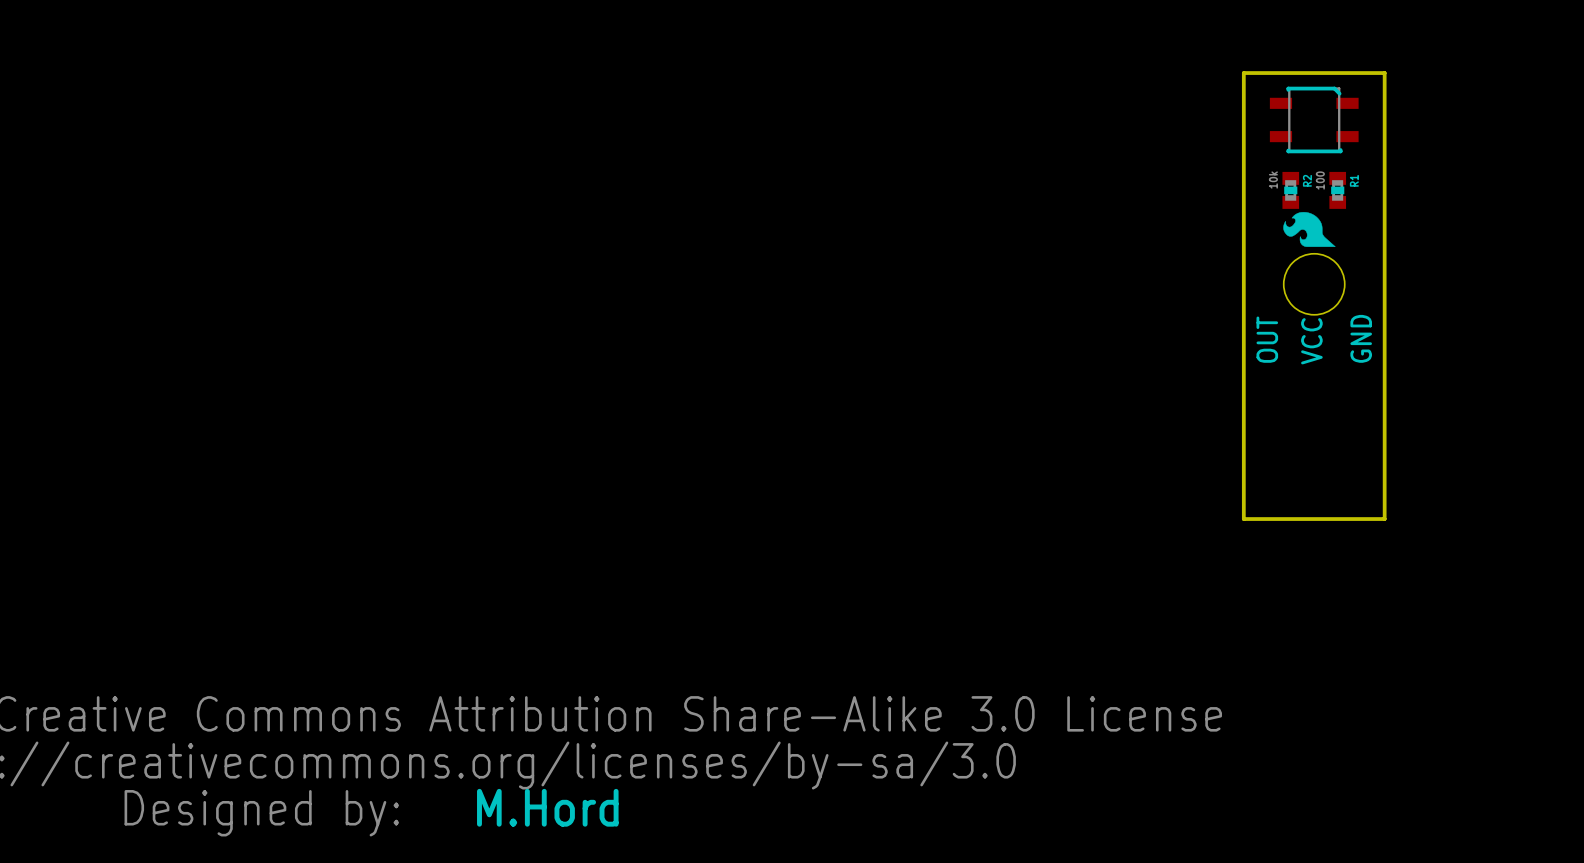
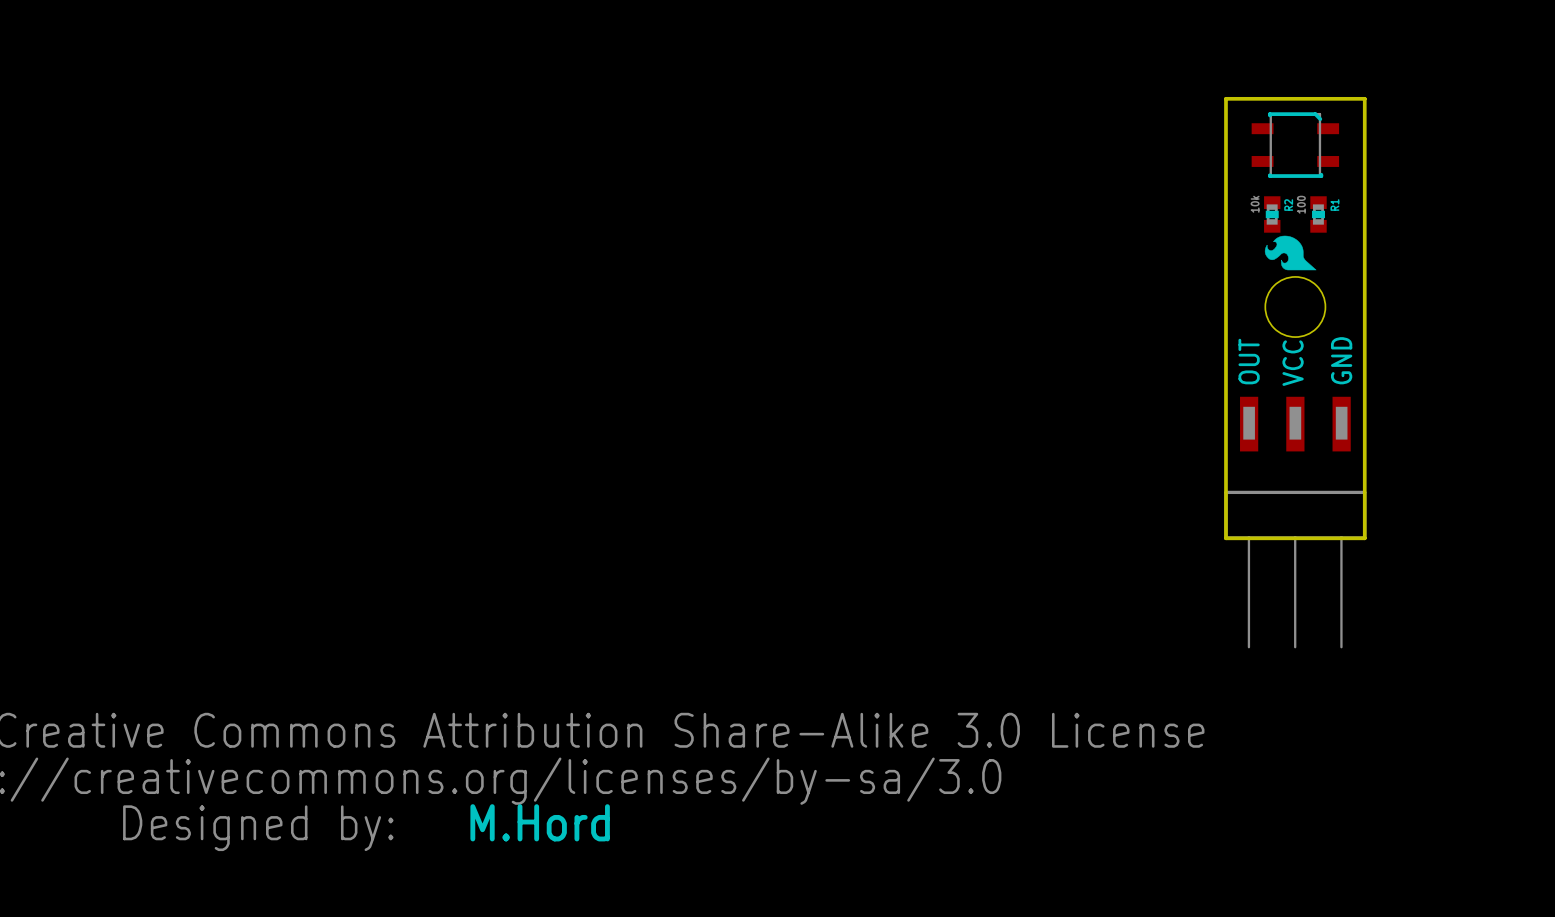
part: none -> (1295, 522)

